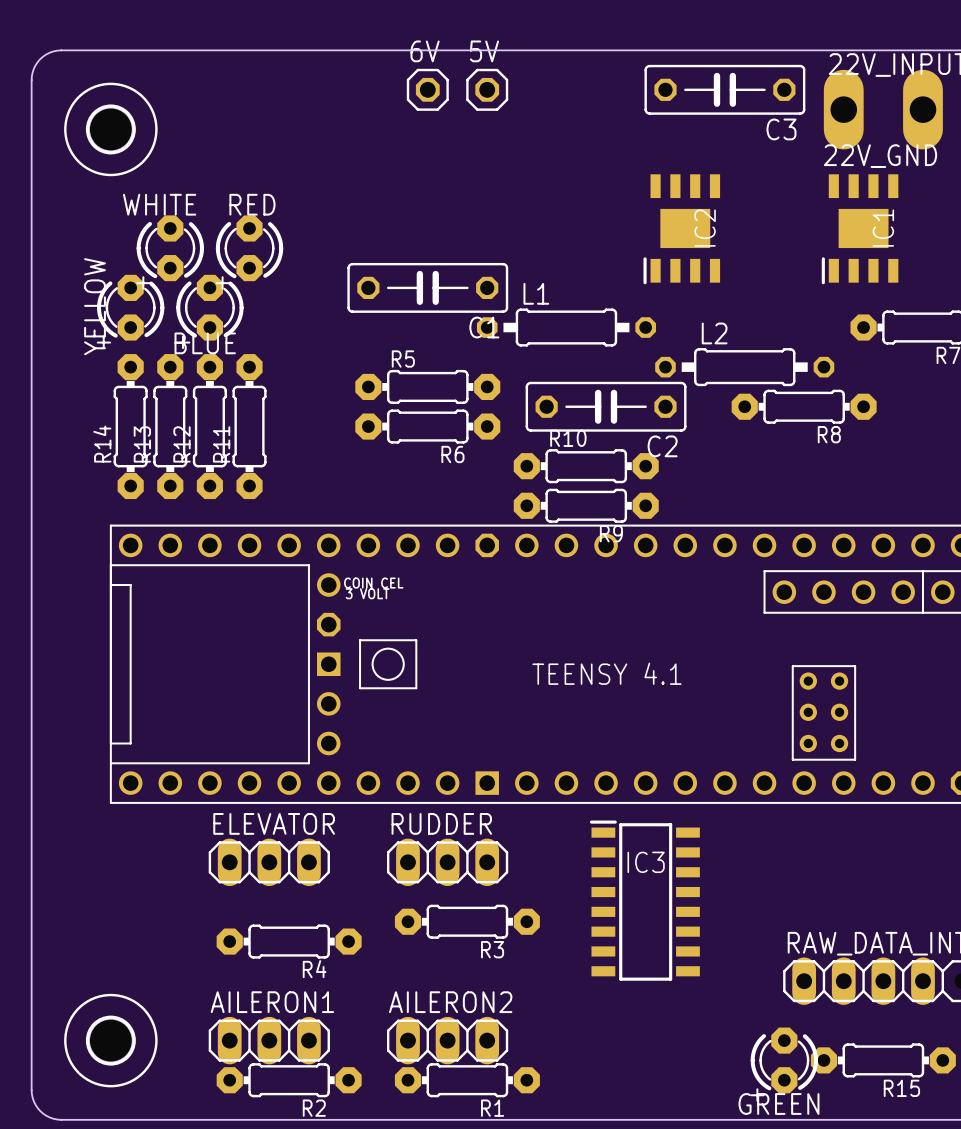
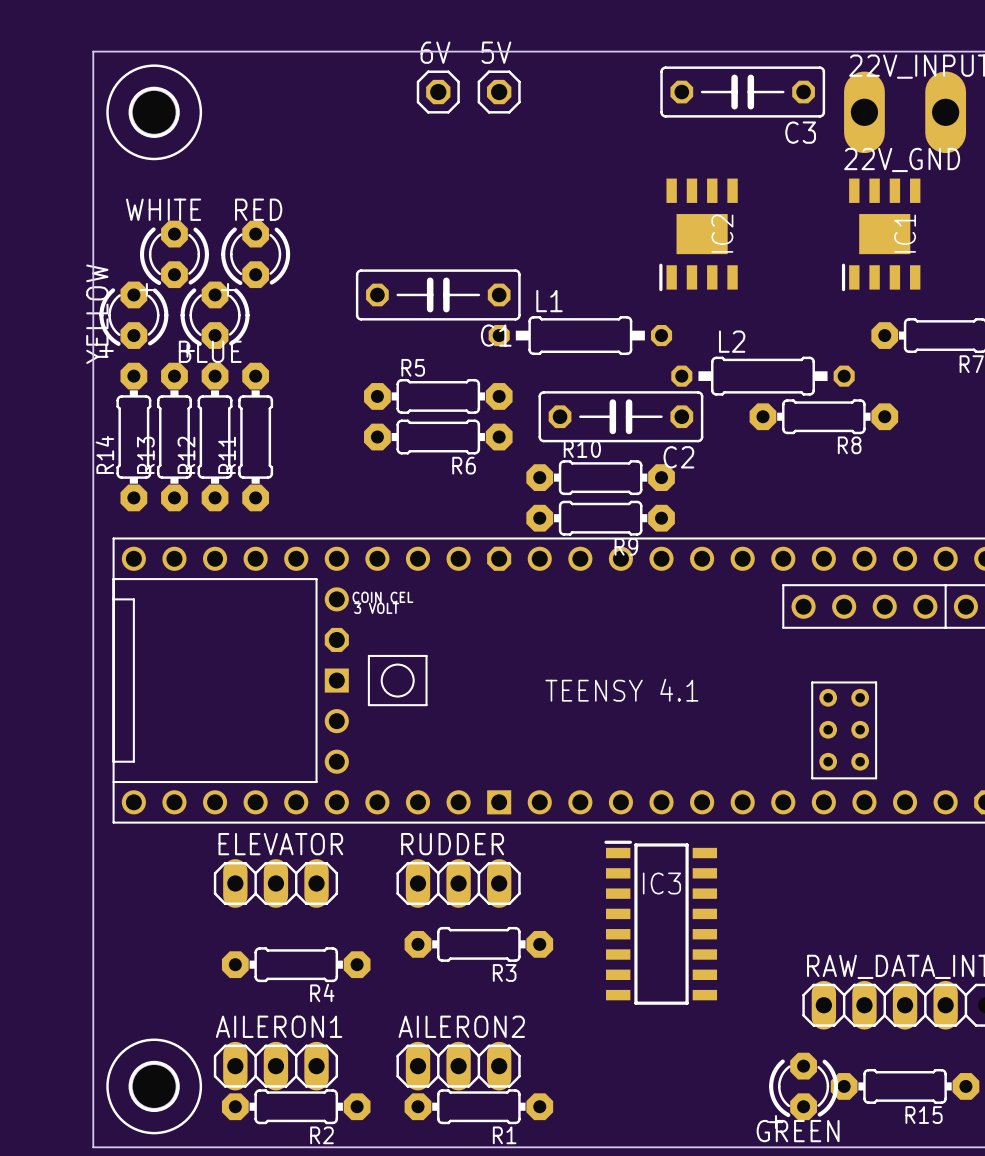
board edge: (91, 50) (57, 50) (46, 54) (35, 65) (31, 80) (31, 1090) (35, 1104) (46, 1115) (57, 1119) (91, 1119) -> (93, 51) (93, 1147)
part position: (110, 129) -> (154, 112)
part position: (110, 1040) -> (154, 1086)

